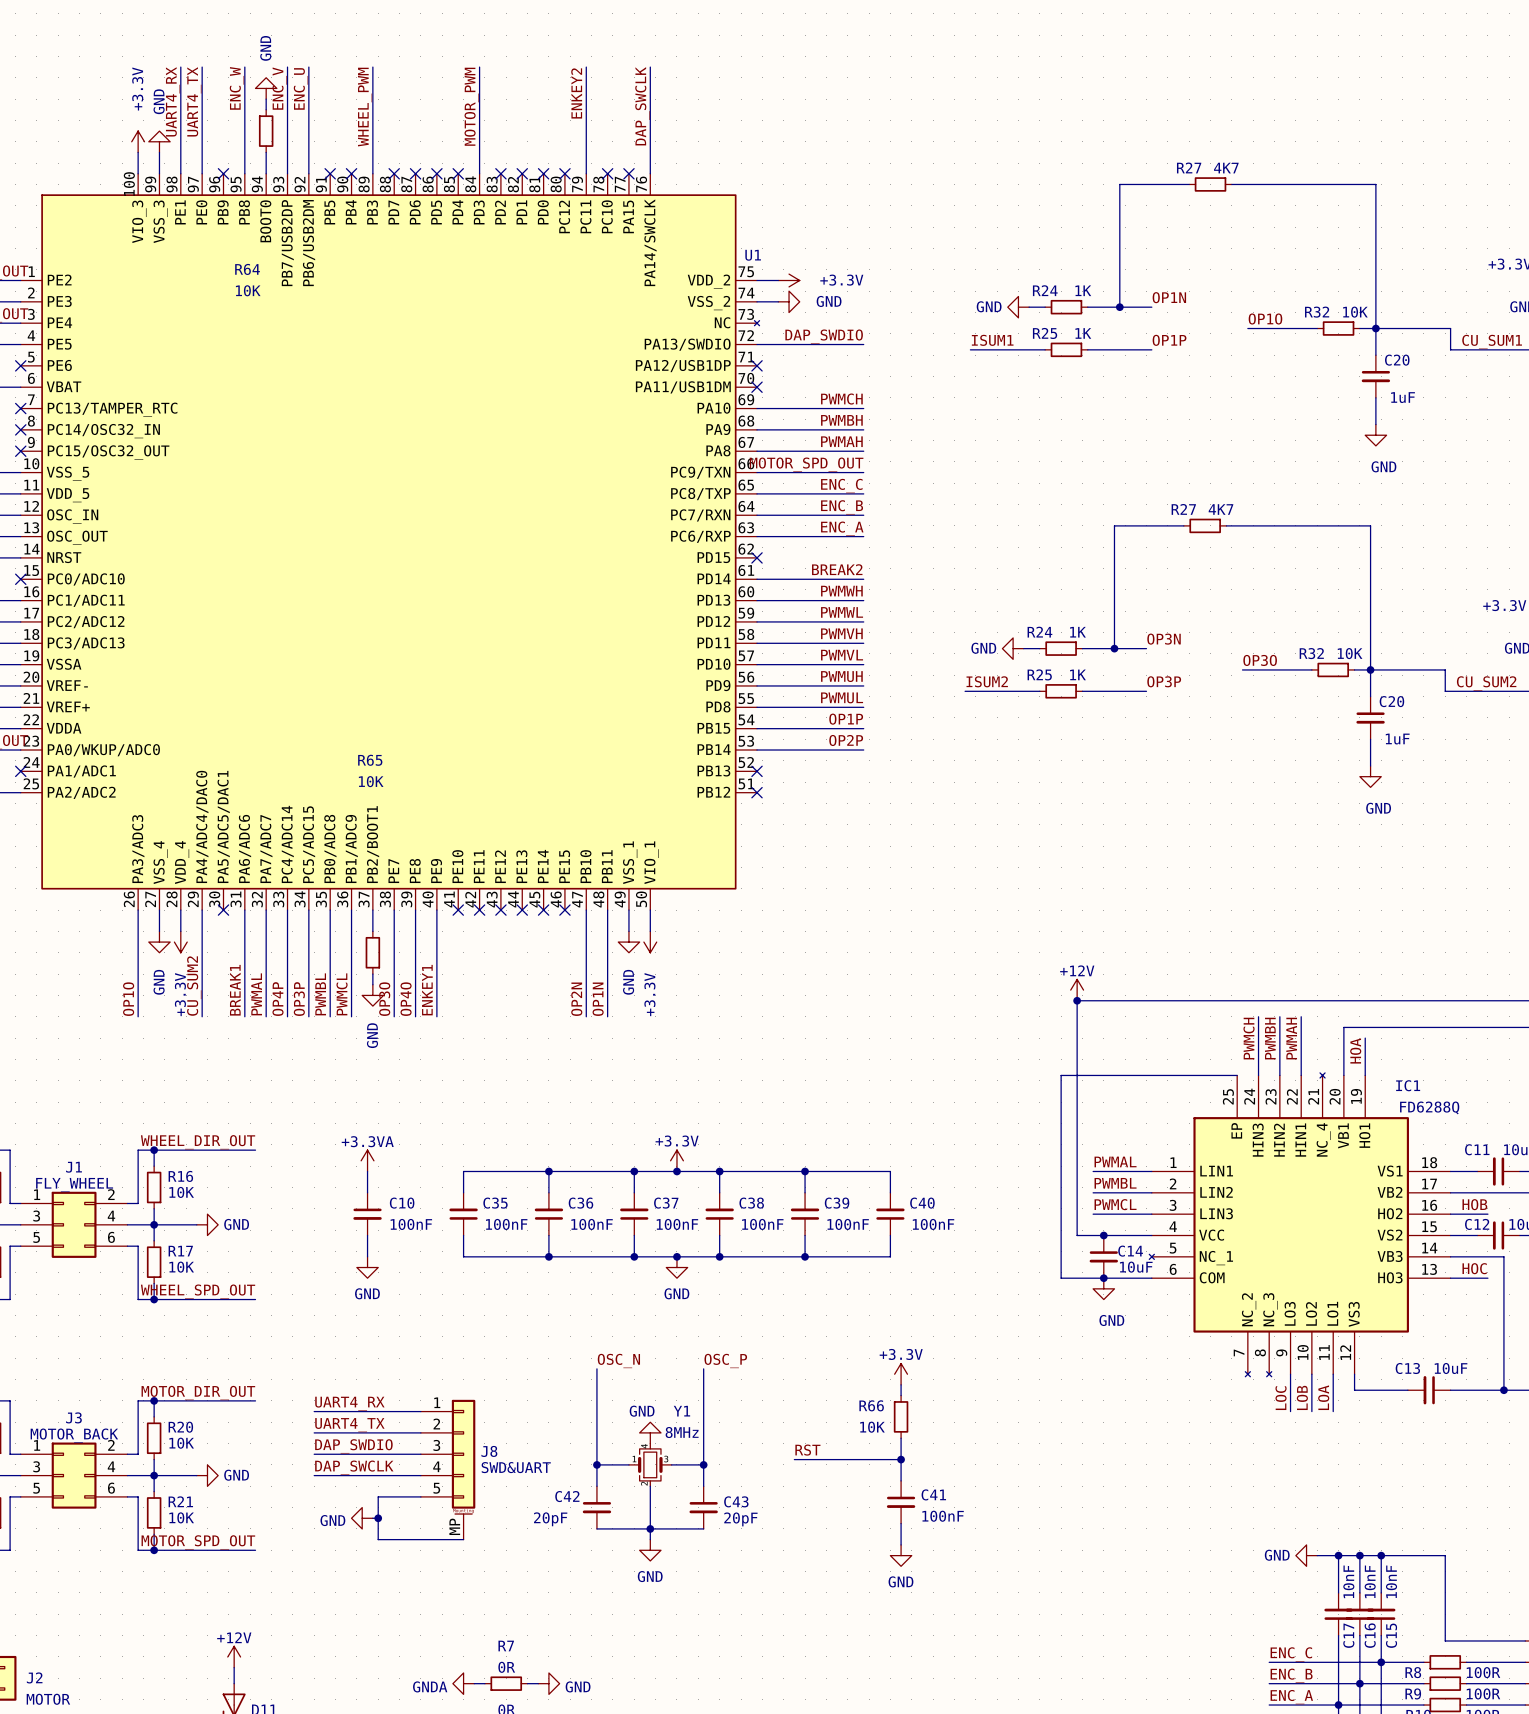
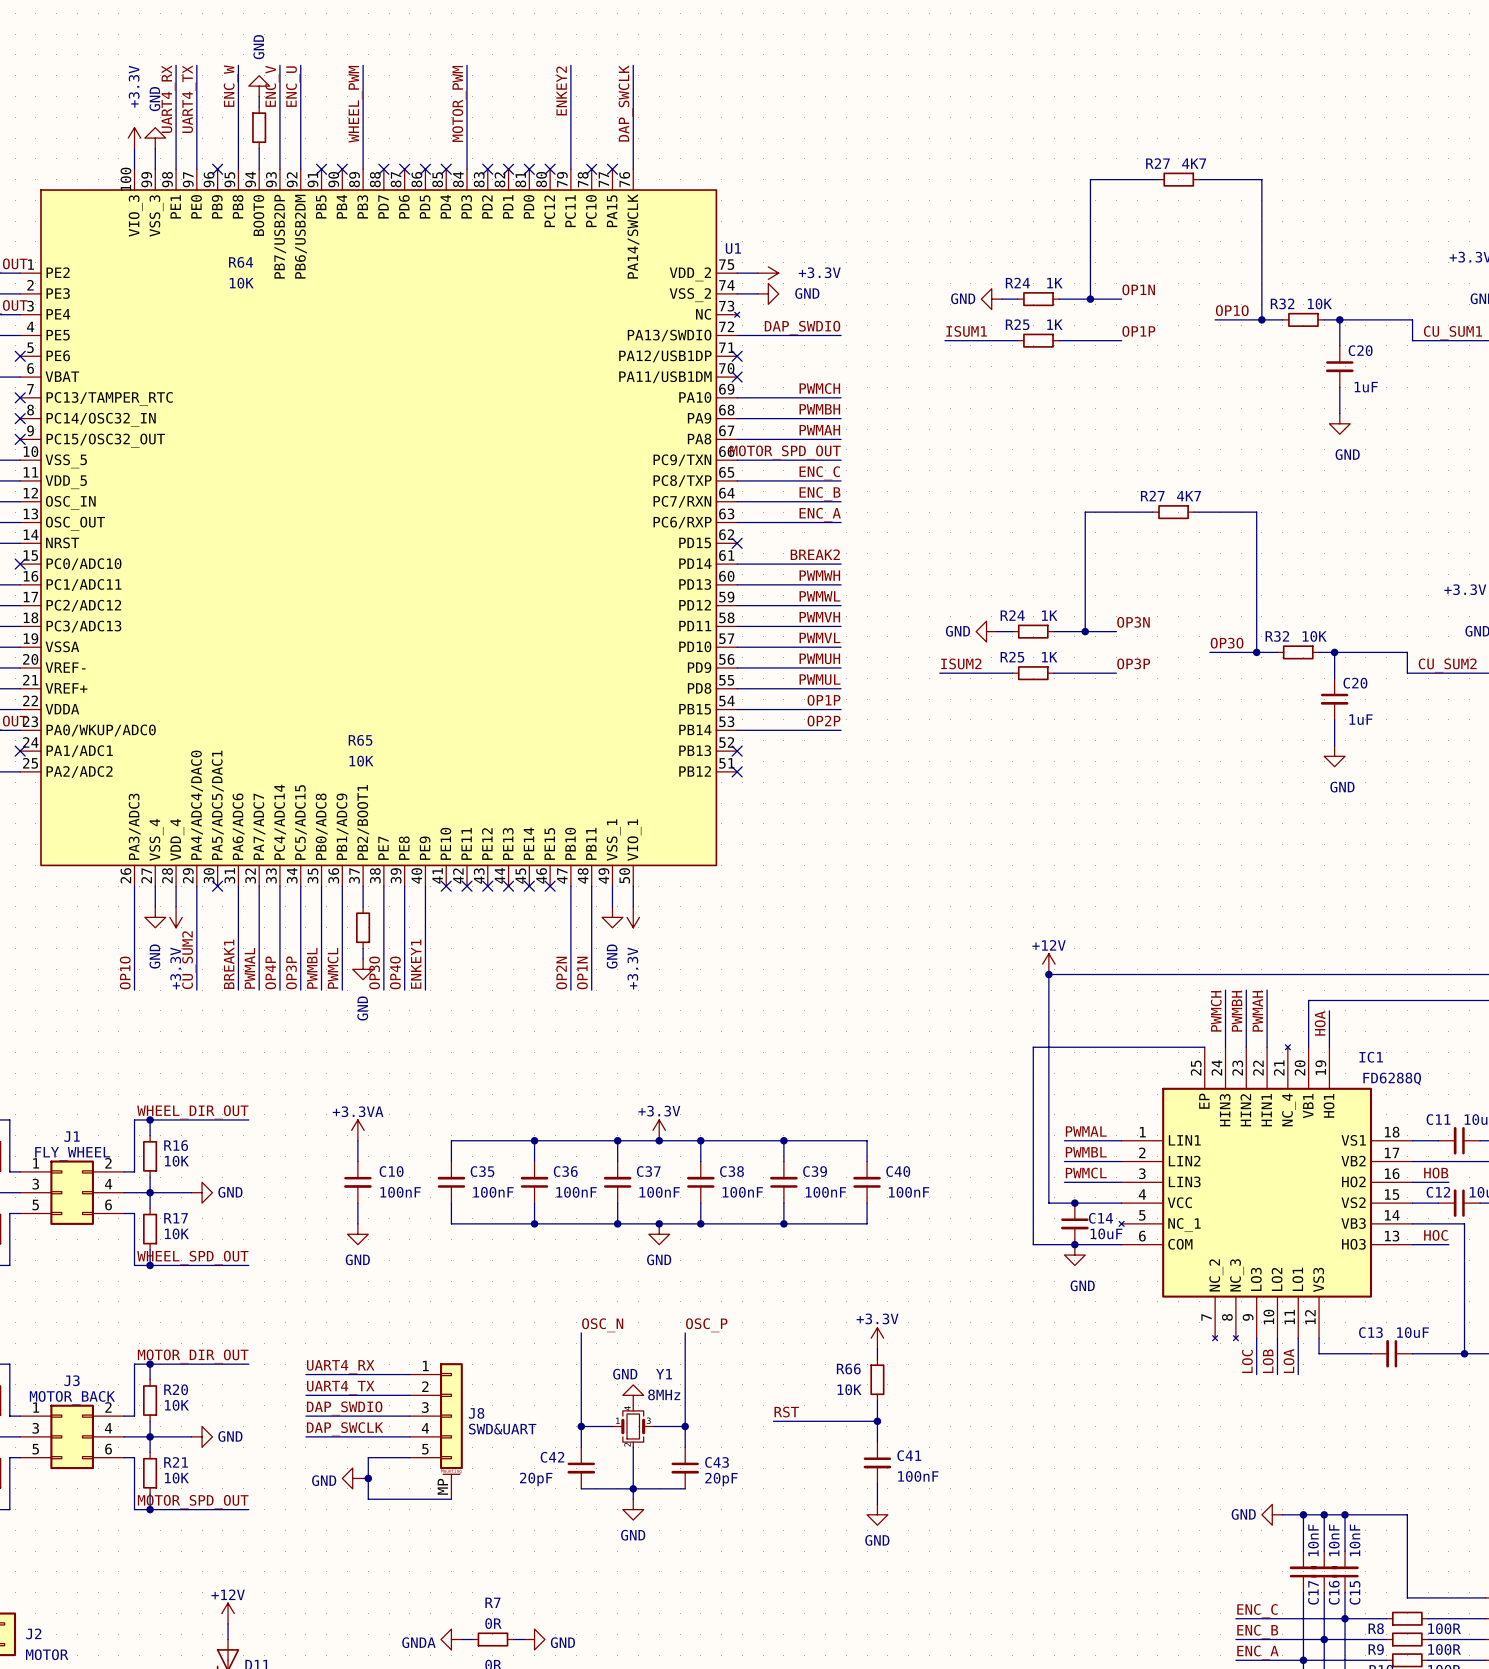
wire: (1295, 184) (1375, 184) (1375, 328) -> (1261, 179) (1261, 319)
junction: none -> (1261, 319)
wire: (1290, 525) (1370, 525) (1370, 669) -> (1256, 512) (1256, 652)
junction: none -> (1256, 652)

